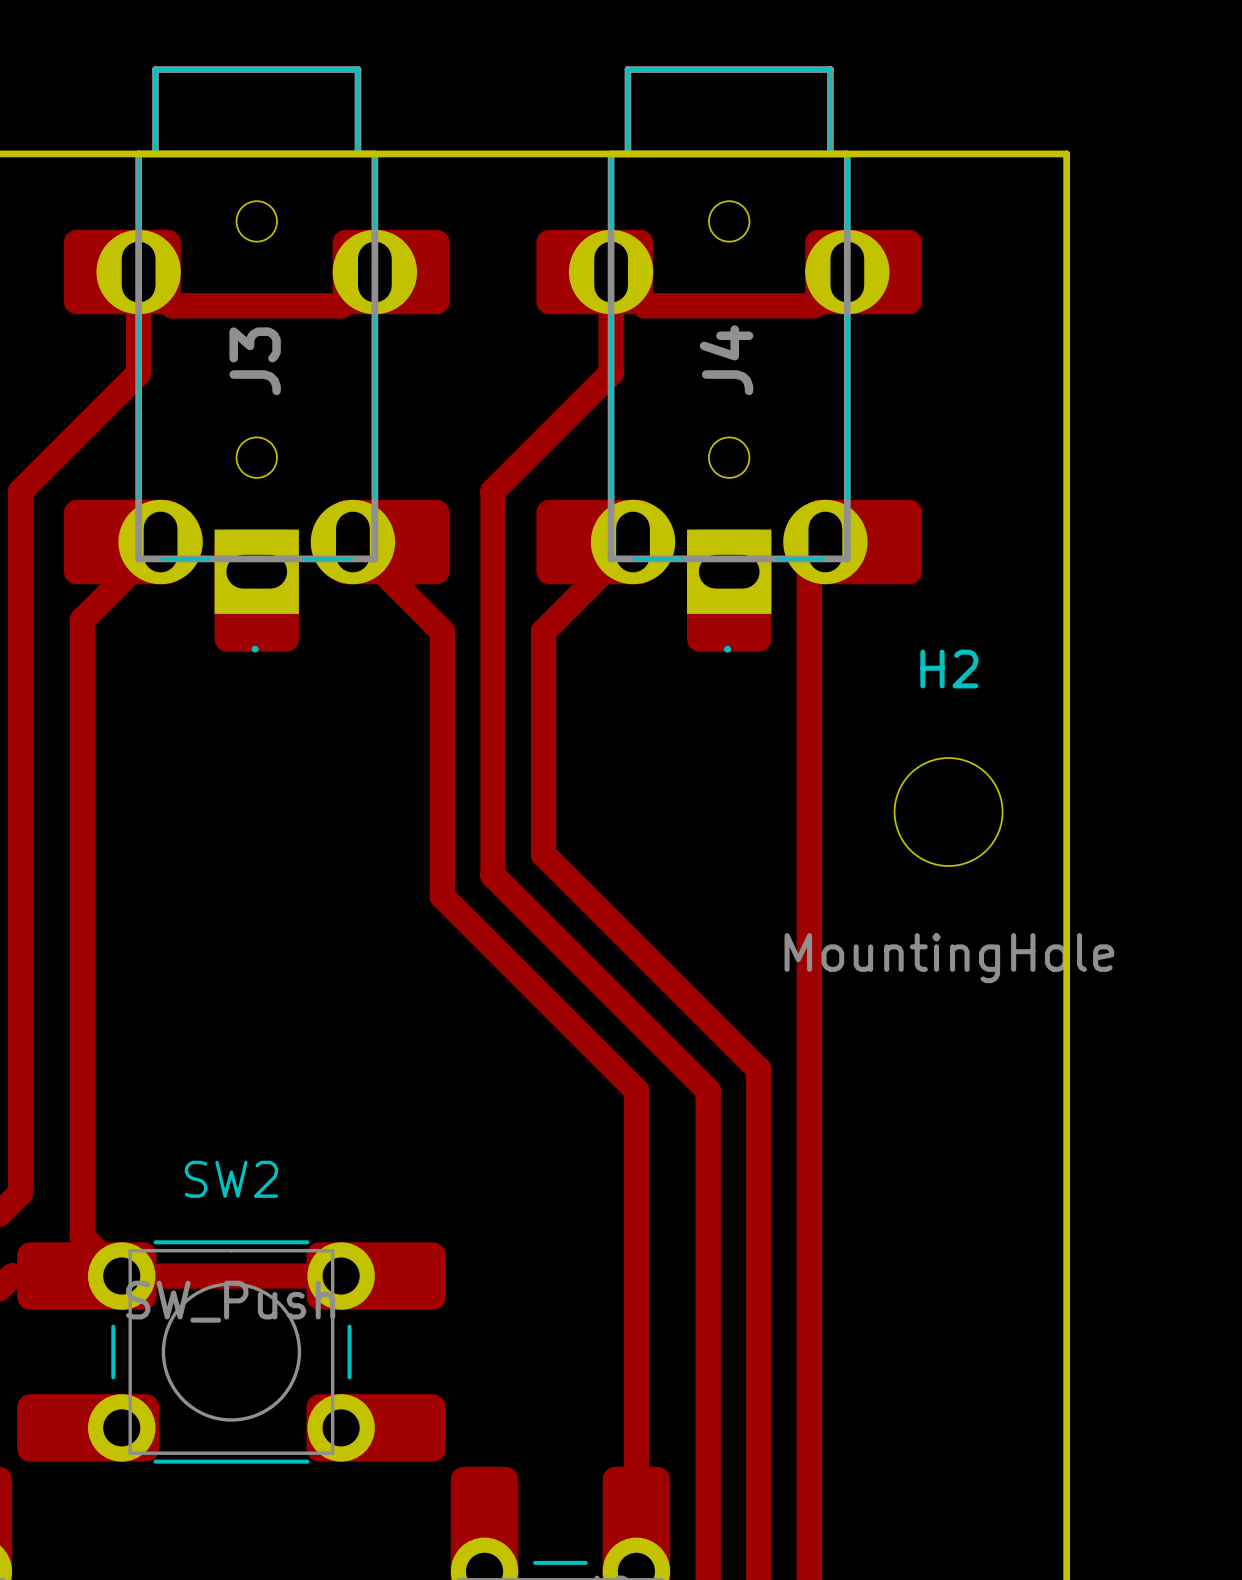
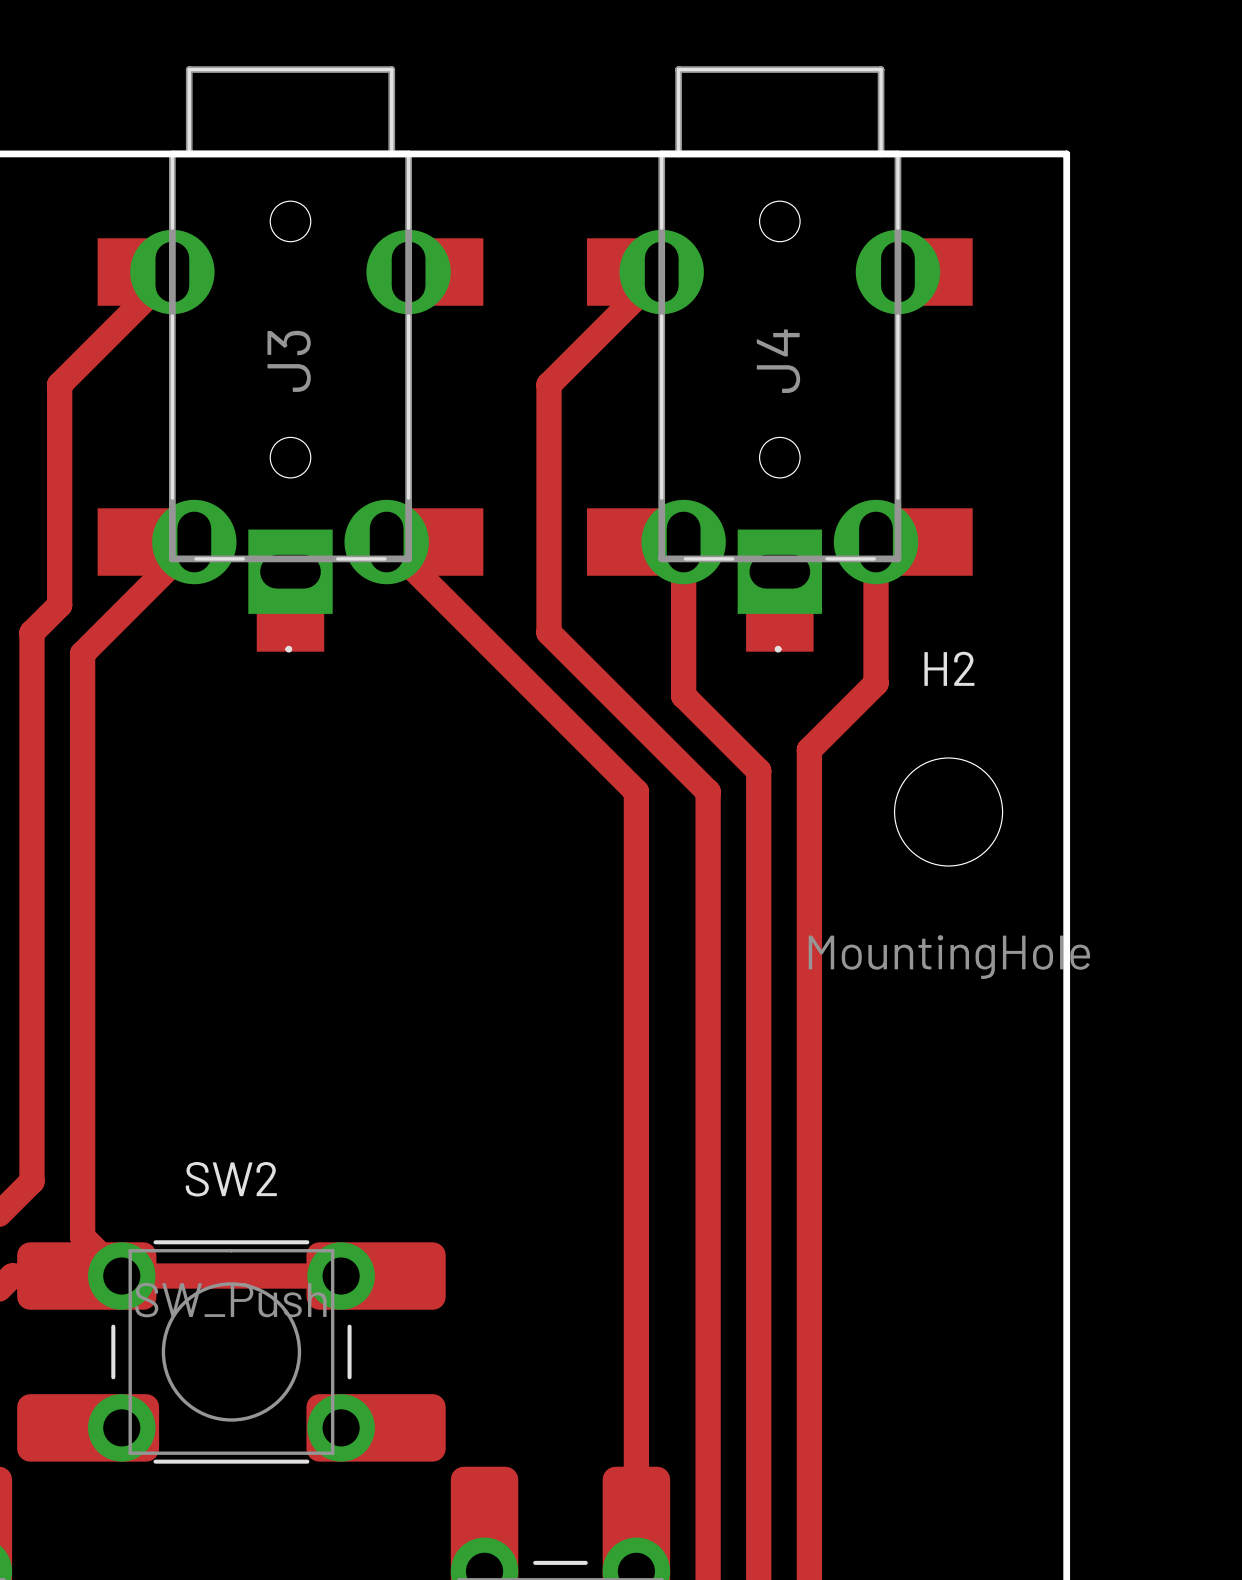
J3 footprint: [63, 66, 450, 653] -> [97, 66, 484, 653]
J4 footprint: [536, 66, 923, 653] -> [586, 66, 973, 653]
track: (374, 272) (341, 305) (172, 305) (138, 272) (138, 373) (20, 491) (20, 1192) -> (172, 272) (59, 384) (59, 605) (31, 632) (31, 1181) (20, 1192)
track: (847, 272) (813, 305) (644, 305) (611, 272) (611, 373) (492, 491) (492, 875) (708, 1090) -> (661, 272) (549, 384) (549, 632) (708, 791) (708, 1090)
track: (160, 542) (82, 619) (82, 653) -> (194, 542) (82, 653)
track: (352, 542) (442, 631) (442, 896) (636, 1090) -> (386, 542) (636, 791) (636, 1090)
track: (633, 542) (543, 631) (543, 854) (758, 1069) -> (683, 542) (683, 695) (758, 770) (758, 1069)
track: (825, 542) (809, 558) (809, 749) -> (876, 542) (876, 683) (809, 749)

